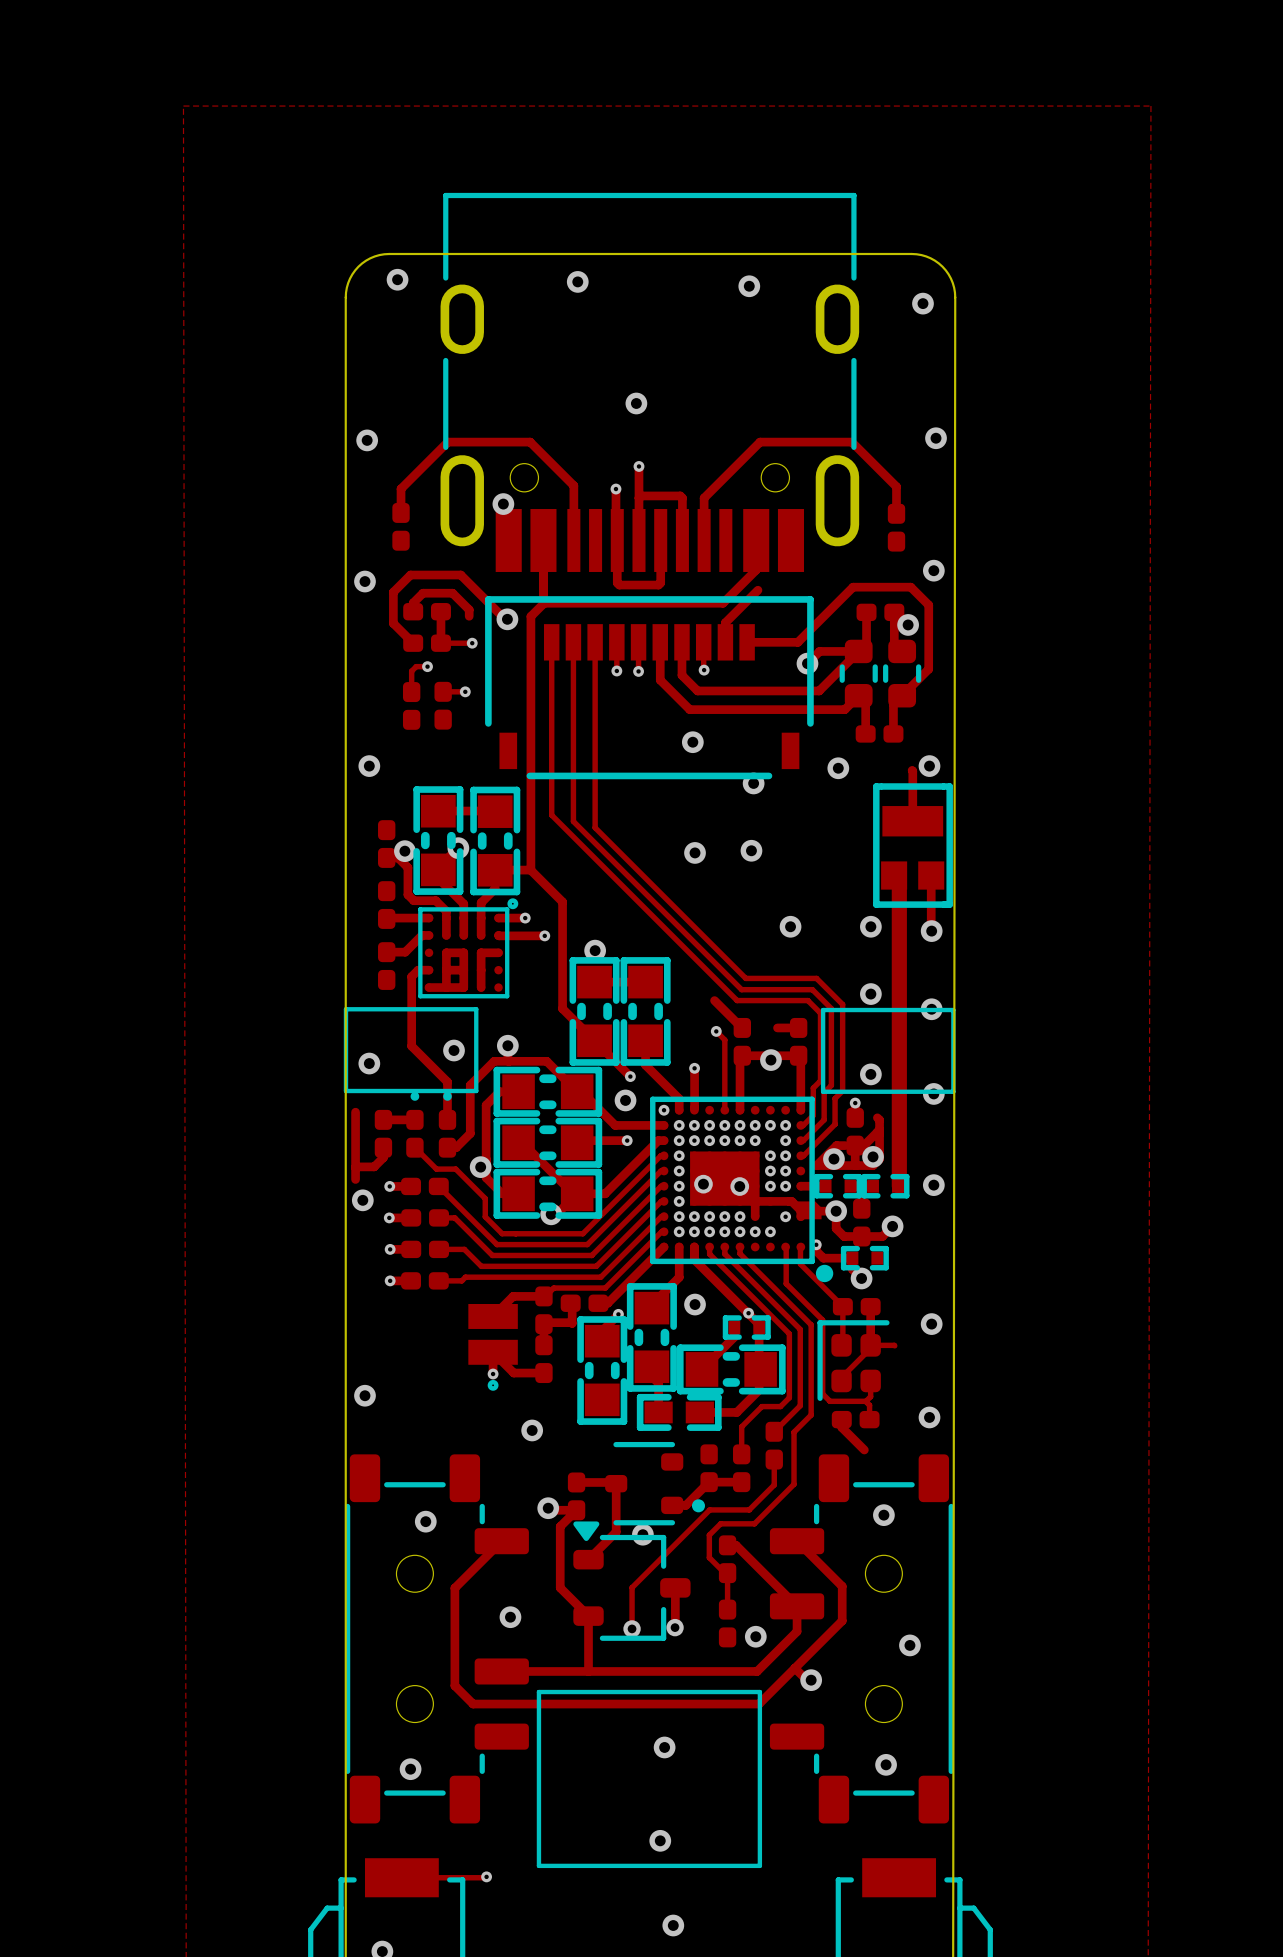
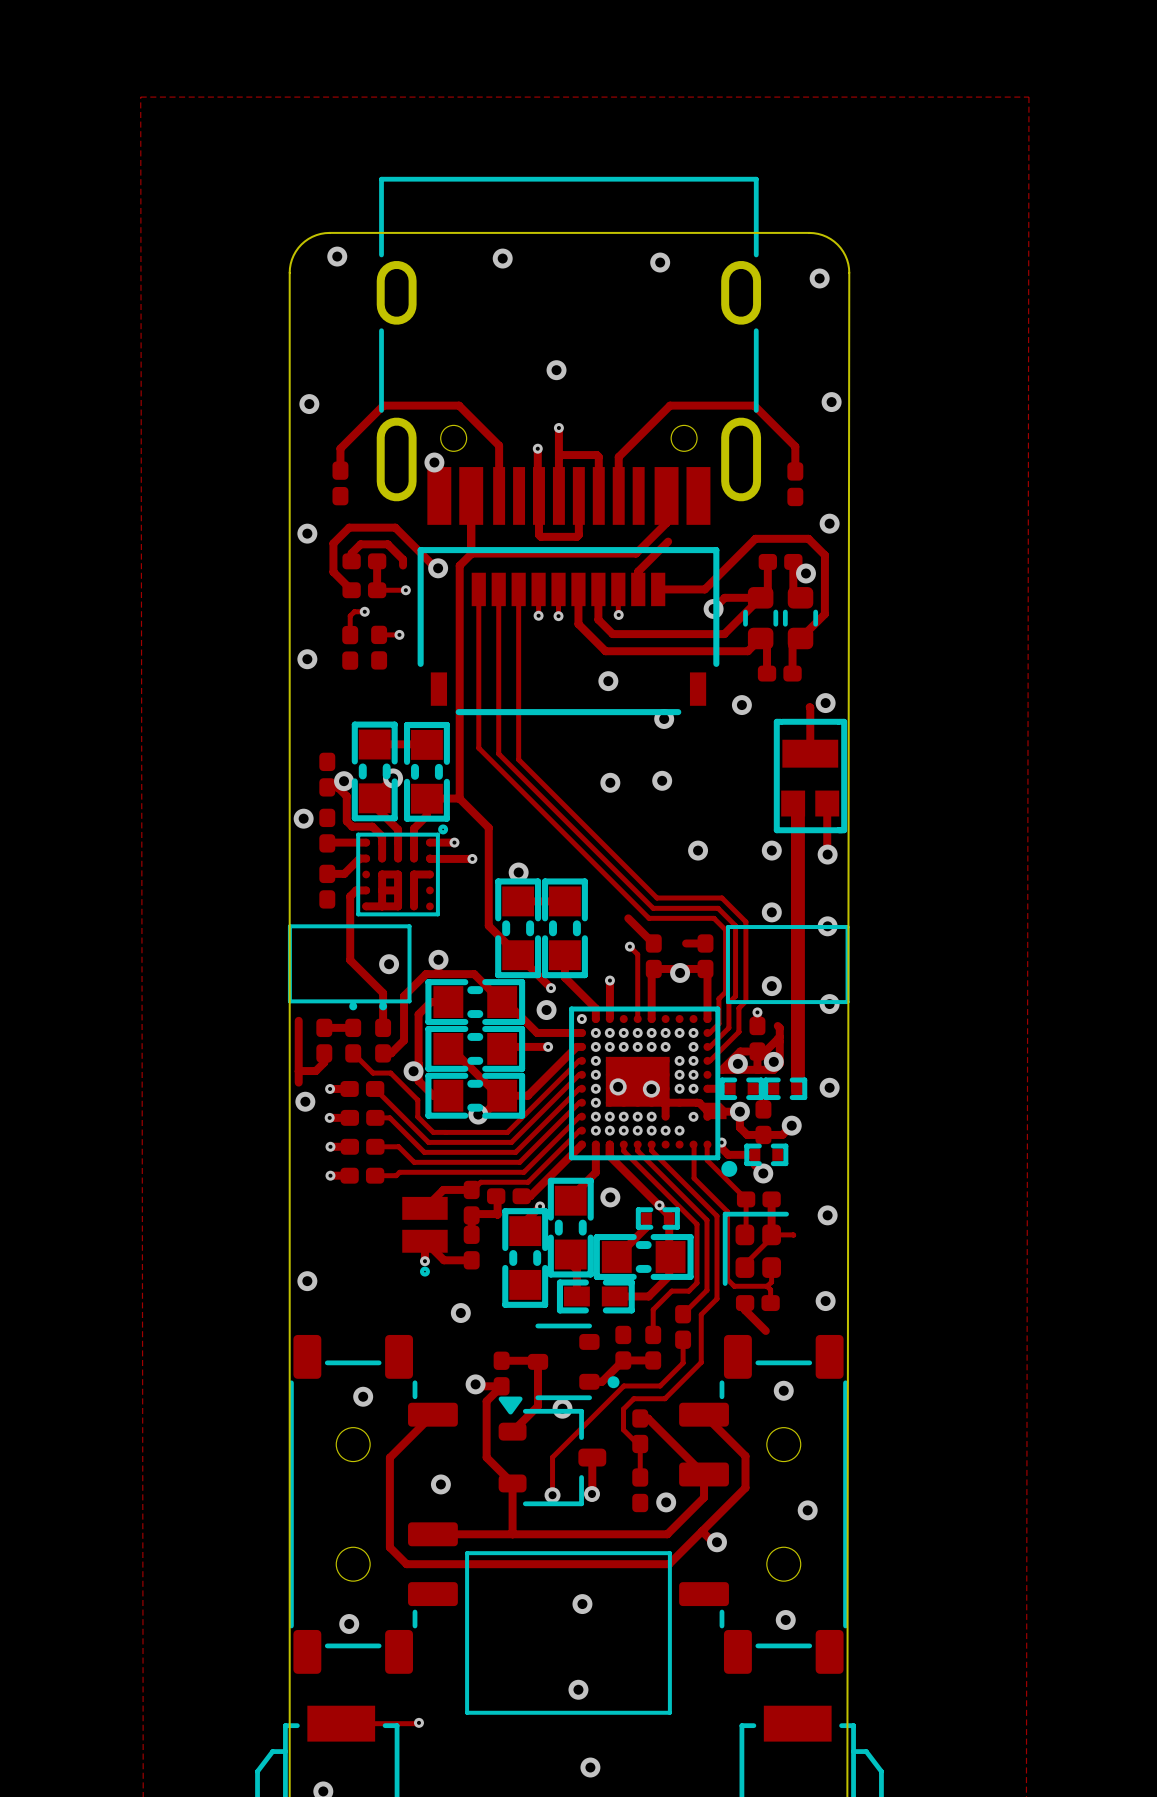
via position: (369, 766) -> (307, 659)
via: none -> (303, 818)
via: (369, 1063) -> none

